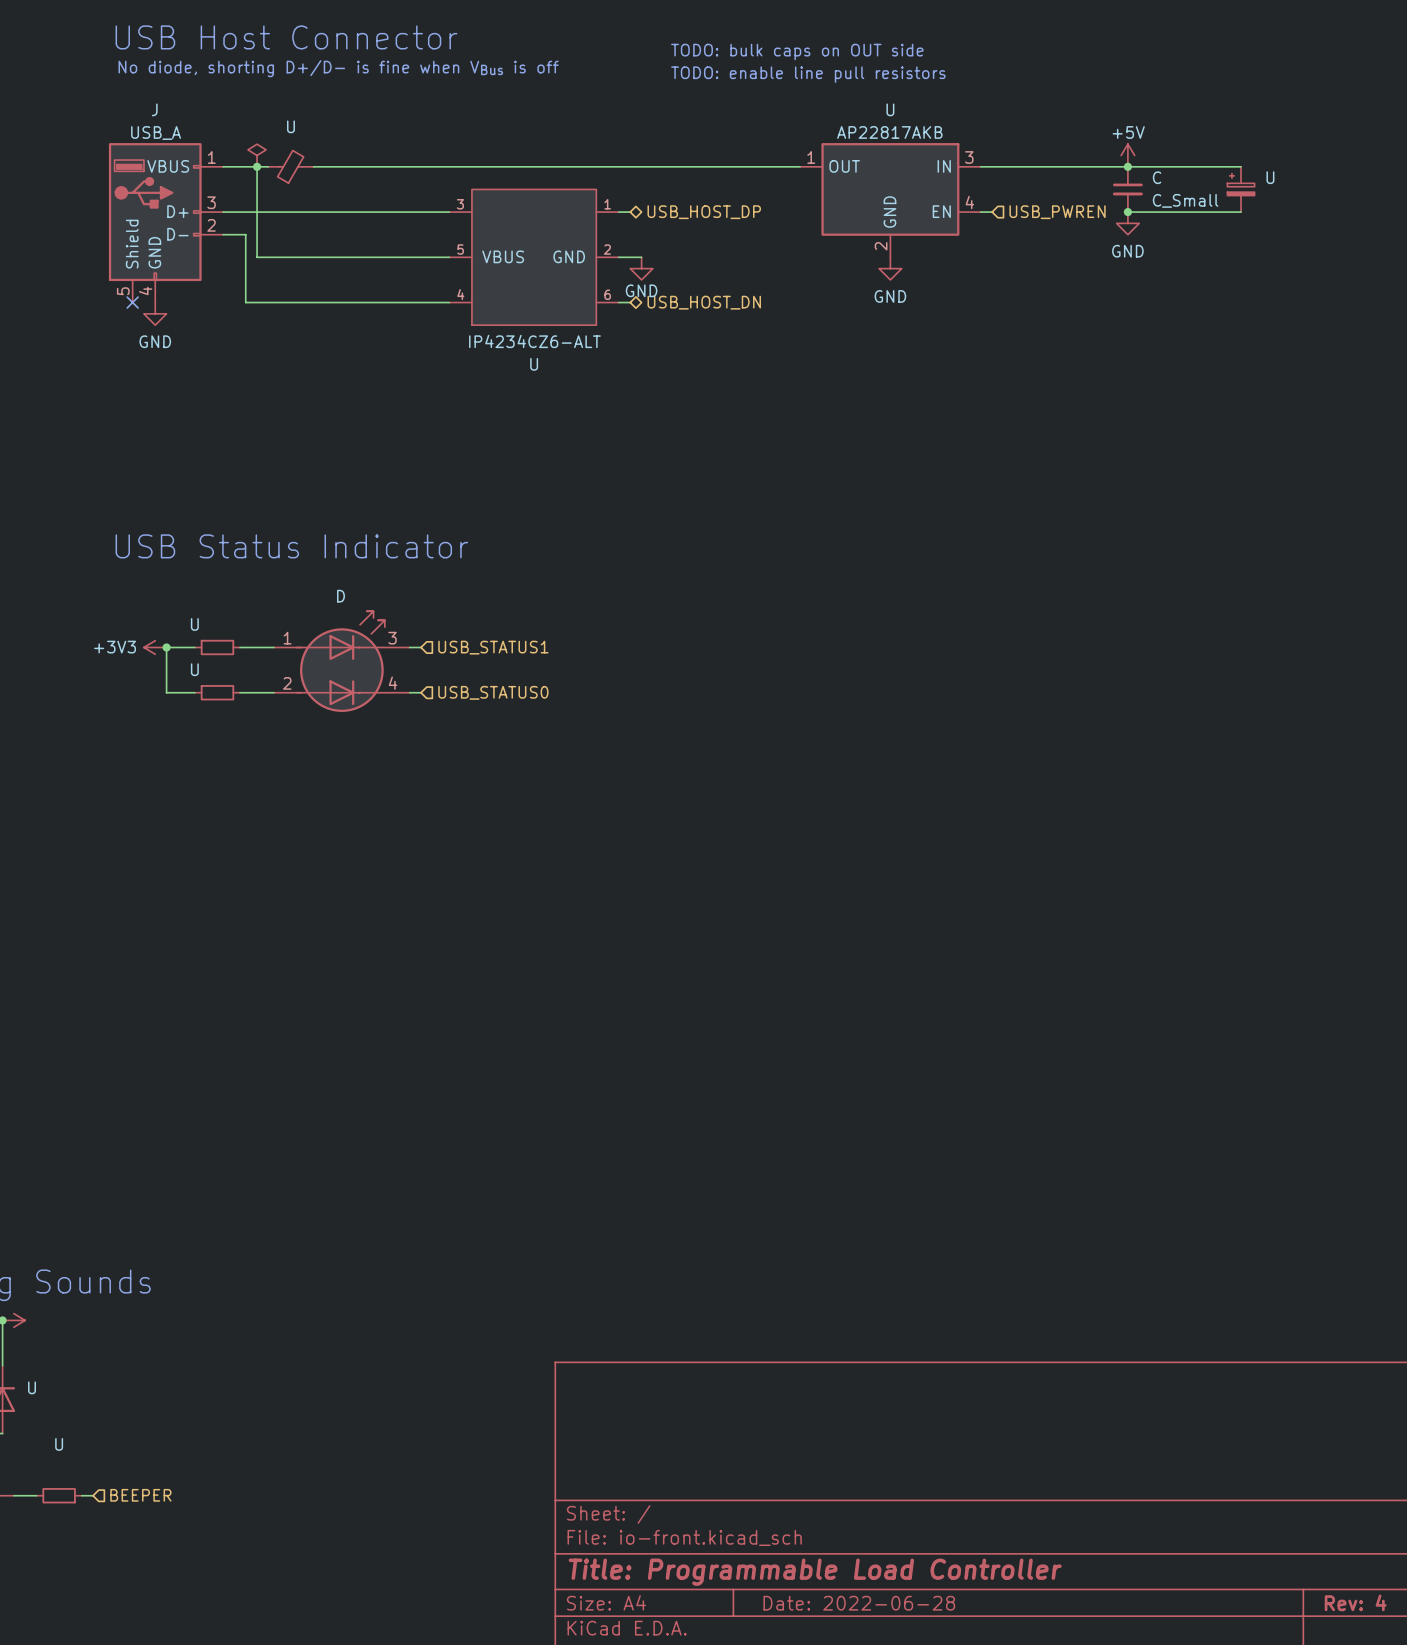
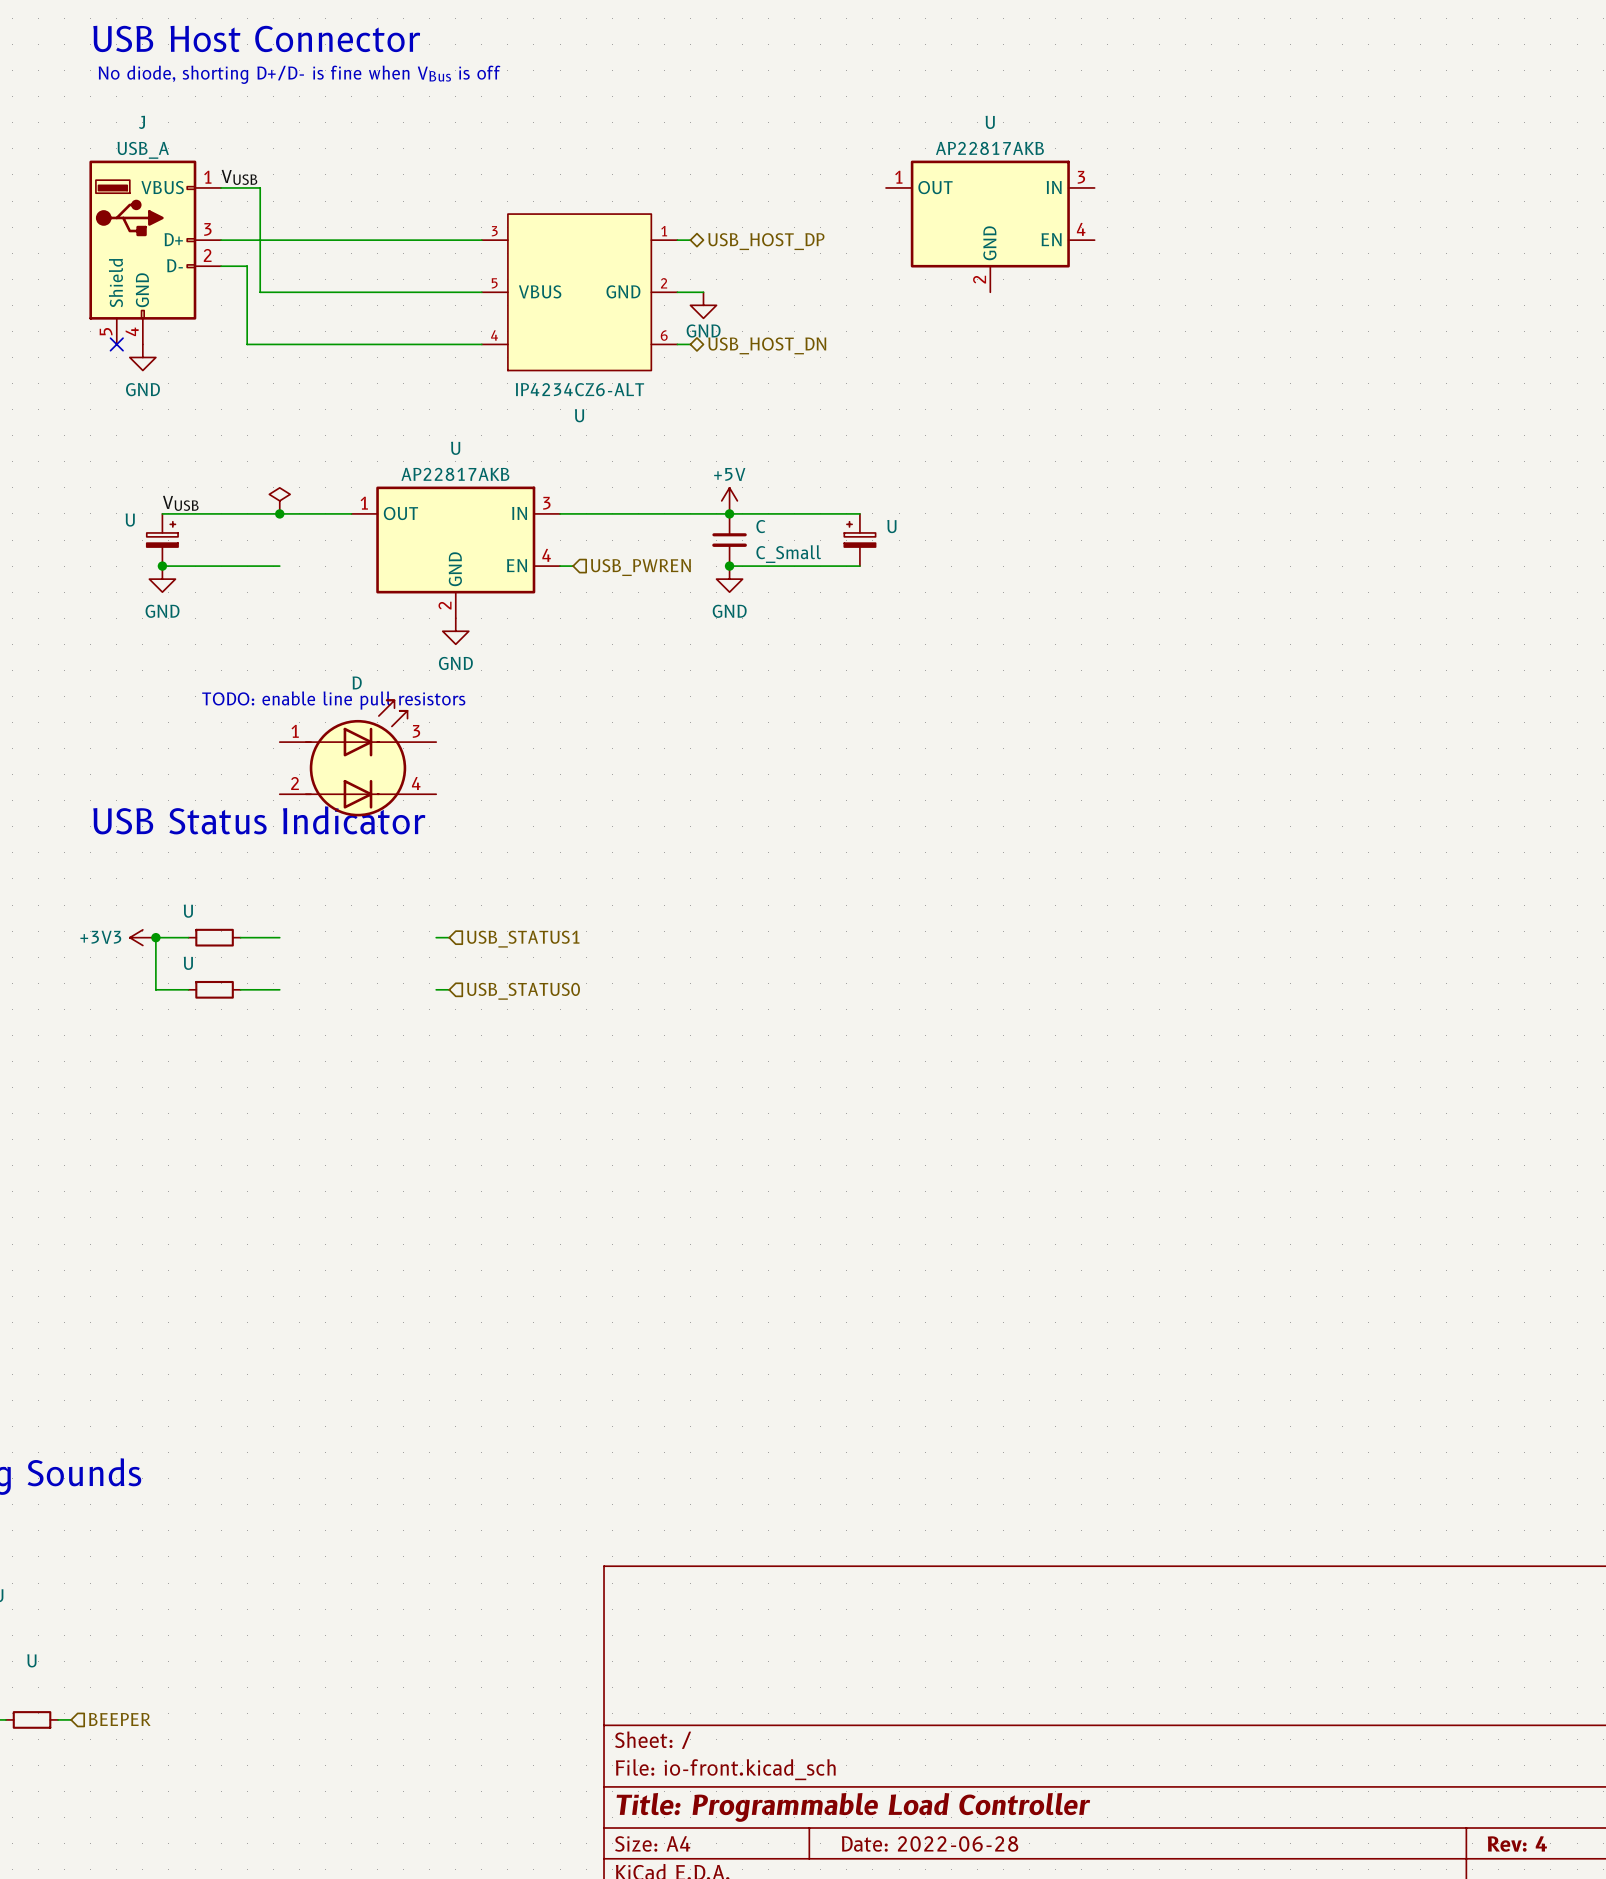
text: TODO: bulk caps on OUT side (797, 52) -> none
text: TODO: enable line pull resistors (808, 74) -> none
power symbol: (257, 155) -> none
power symbol: +5V (1127, 155) -> none
label: none -> VUSB (239, 177)
wire: (257, 166) (268, 166) -> none
junction: (257, 166) -> none
U: (290, 166) -> none
wire: (313, 166) (799, 166) -> none
wire: (980, 166) (1241, 166) -> none
junction: (1127, 166) -> none
C: C_Small (1127, 189) -> none
U: (1241, 189) -> none
wire: (980, 212) (992, 212) -> none
hierarchical label: USB_PWREN (1057, 212) -> none
wire: (1127, 212) (1241, 212) -> none
junction: (1127, 212) -> none
power symbol: GND (1127, 223) -> none
power symbol: GND (890, 268) -> none
power symbol: none -> (279, 500)
power symbol: none -> +5V (729, 500)
label: none -> VUSB (180, 503)
wire: none -> (162, 513) (351, 513)
junction: none -> (279, 513)
wire: none -> (560, 513) (859, 513)
junction: none -> (729, 513)
U: none -> (162, 540)
C: none -> C_Small (729, 540)
U: none -> (859, 540)
U: none -> AP22817AKB (455, 552)
wire: none -> (162, 566) (279, 566)
junction: none -> (162, 566)
wire: none -> (560, 566) (573, 566)
hierarchical label: none -> USB_PWREN (640, 567)
wire: none -> (729, 566) (859, 566)
junction: none -> (729, 566)
power symbol: none -> GND (162, 579)
power symbol: none -> GND (729, 579)
text position: USB Status Indicator (291, 546) -> USB Status Indicator (259, 820)
power symbol: none -> GND (455, 631)
text: none -> TODO: enable line pull resistors (333, 700)
power symbol position: +3V3 (155, 647) -> +3V3 (142, 937)
junction: (166, 647) -> none
wire: (194, 647) (166, 647) (166, 692) (194, 692) -> (188, 937) (155, 937) (155, 989) (188, 989)
U: (217, 647) -> none
wire: (240, 647) (274, 647) -> (240, 937) (279, 937)
wire: (409, 647) (421, 647) -> (436, 937) (449, 937)
hierarchical label position: USB_STATUS1 (493, 647) -> USB_STATUS1 (523, 939)
U: (217, 692) -> none
wire: (240, 692) (274, 692) -> (240, 989) (279, 989)
wire: (409, 692) (421, 692) -> (436, 989) (449, 989)
hierarchical label position: USB_STATUS0 (493, 692) -> USB_STATUS0 (523, 991)
junction: none -> (155, 937)
U: none -> (214, 937)
U: none -> (214, 989)

